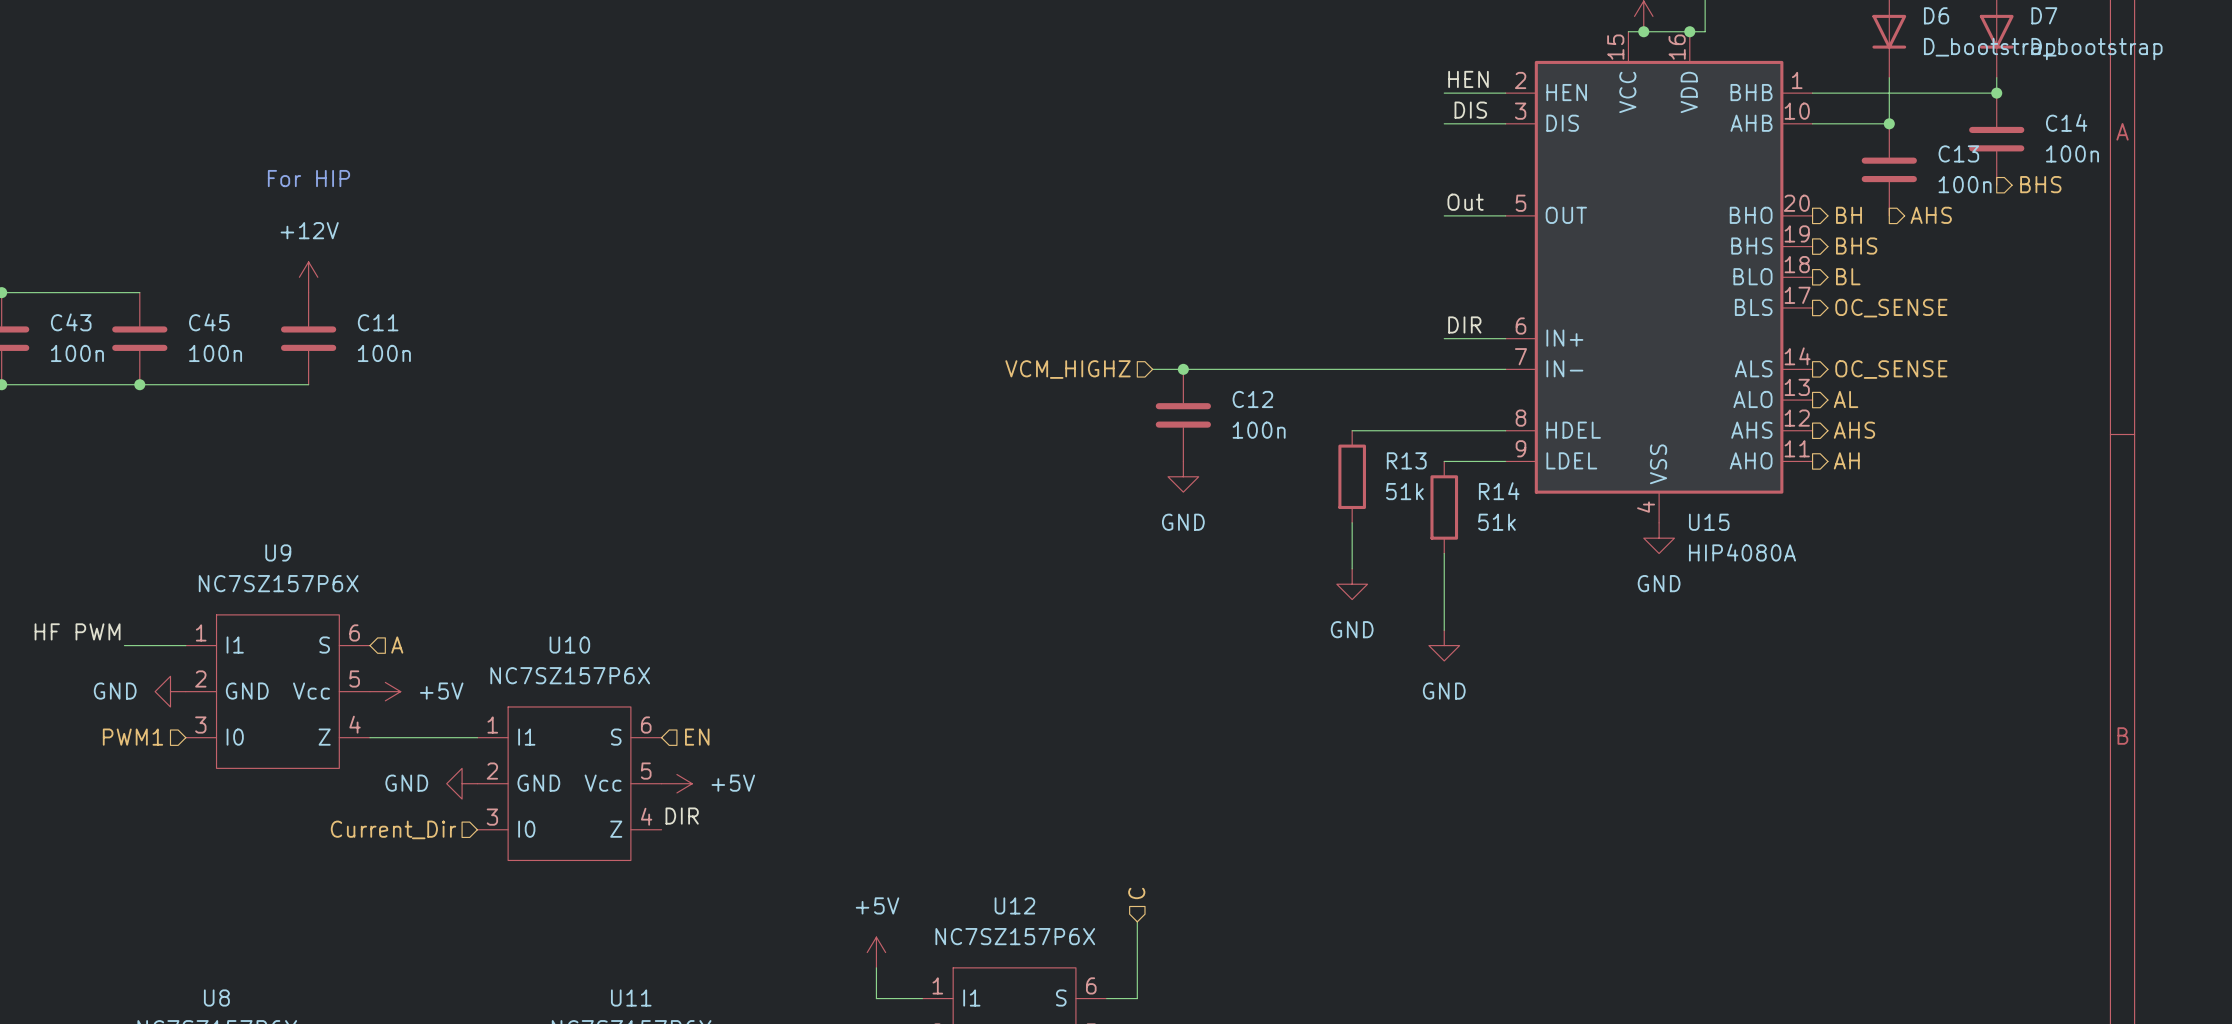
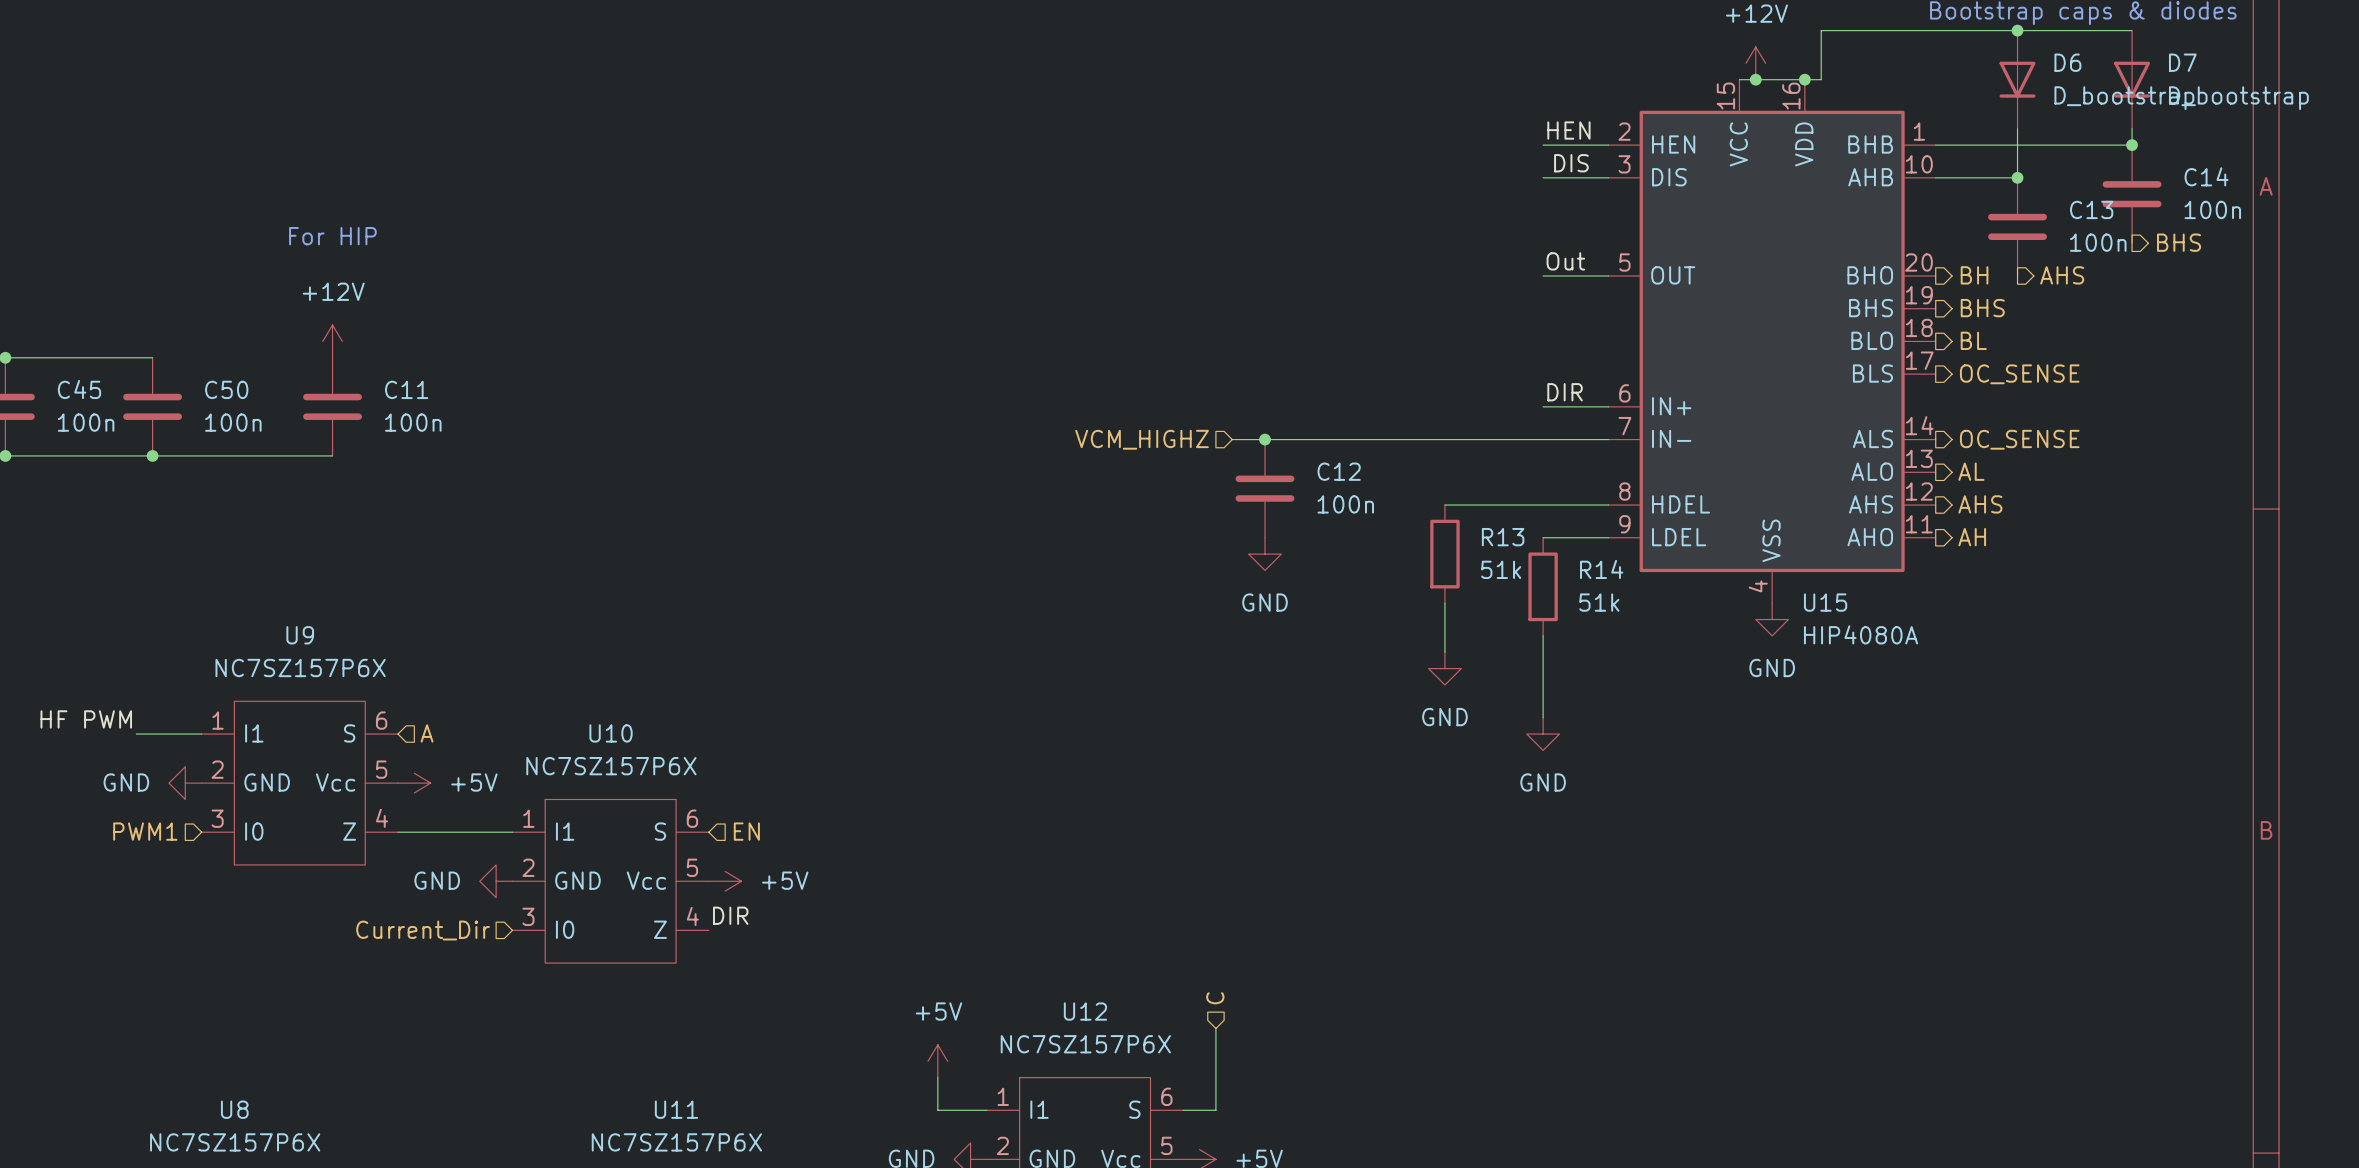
C43 name: C43 (71, 322) -> C45 (79, 389)
C45 name: C45 (209, 322) -> C50 (226, 389)

